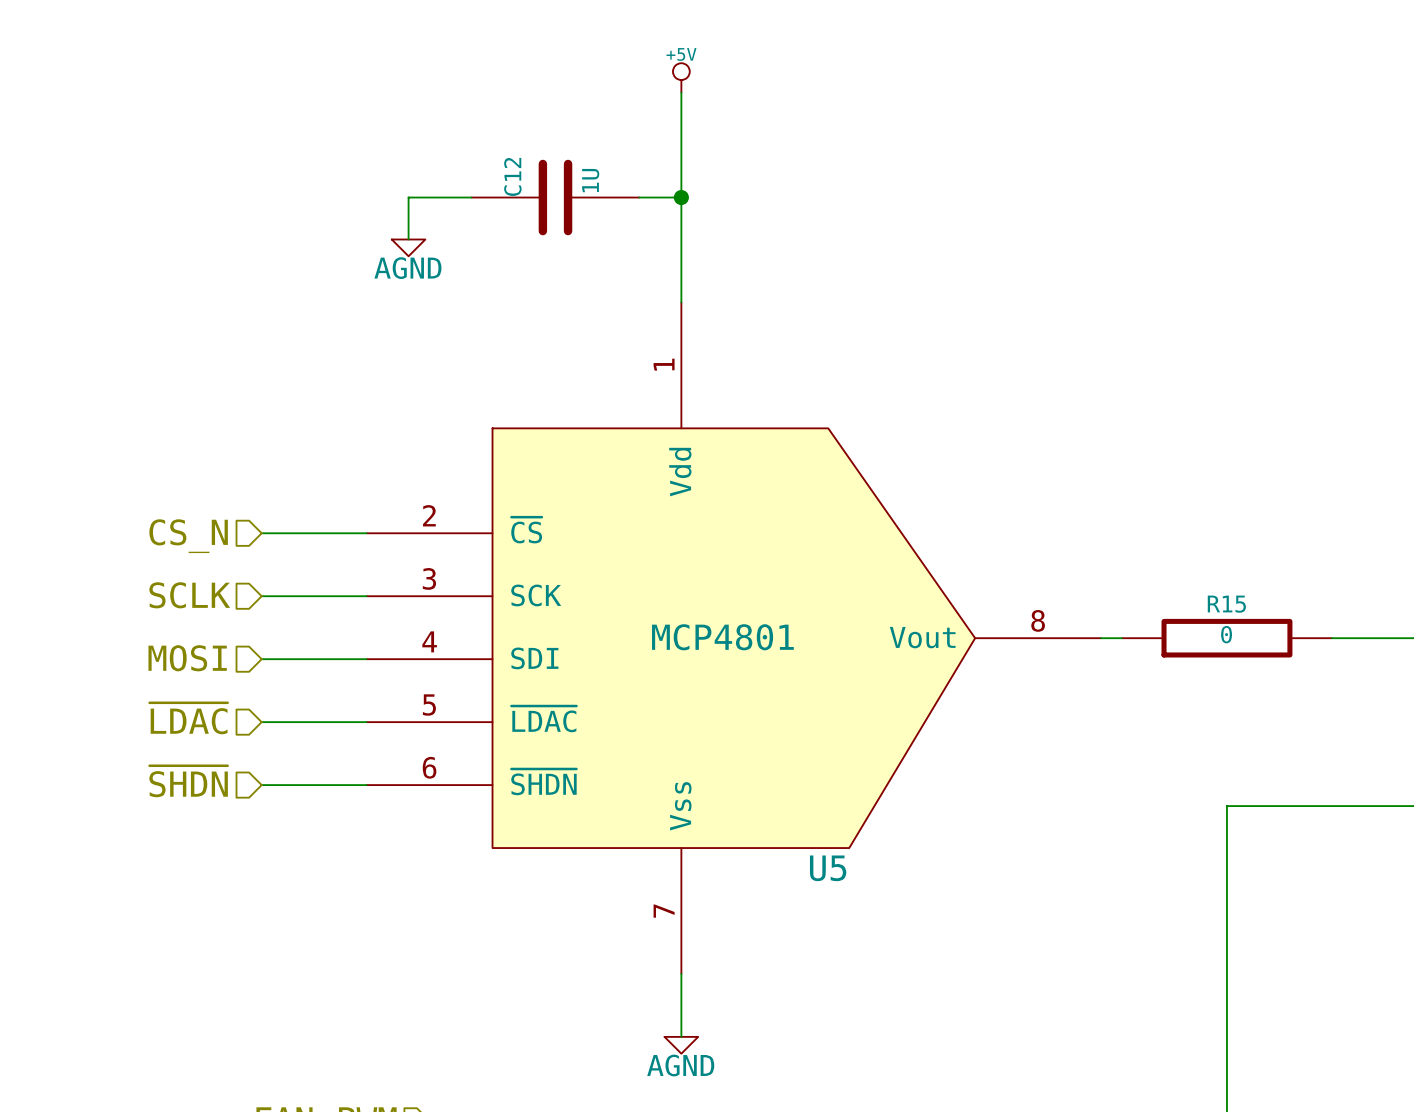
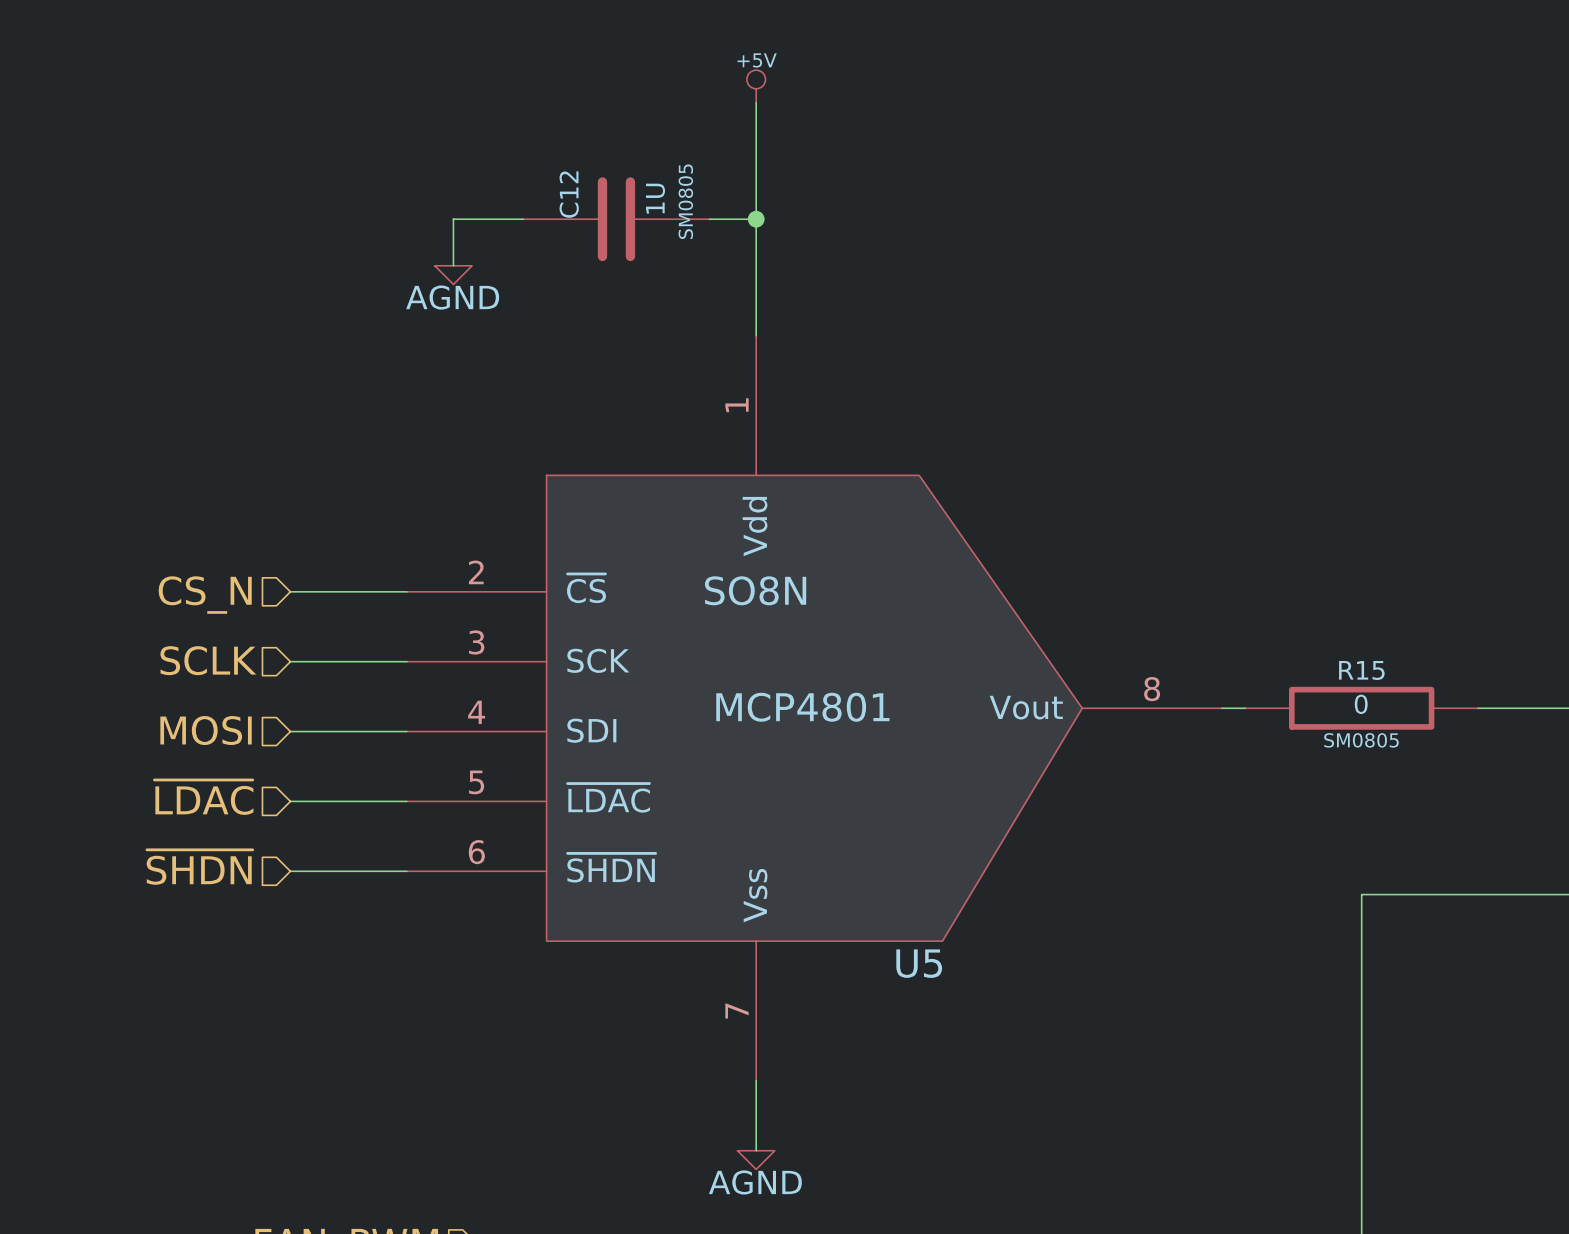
C12 text: none -> SM0805 (685, 201)
U5 text: none -> SO8N (755, 590)
R15 text: none -> SM0805 (1361, 740)

